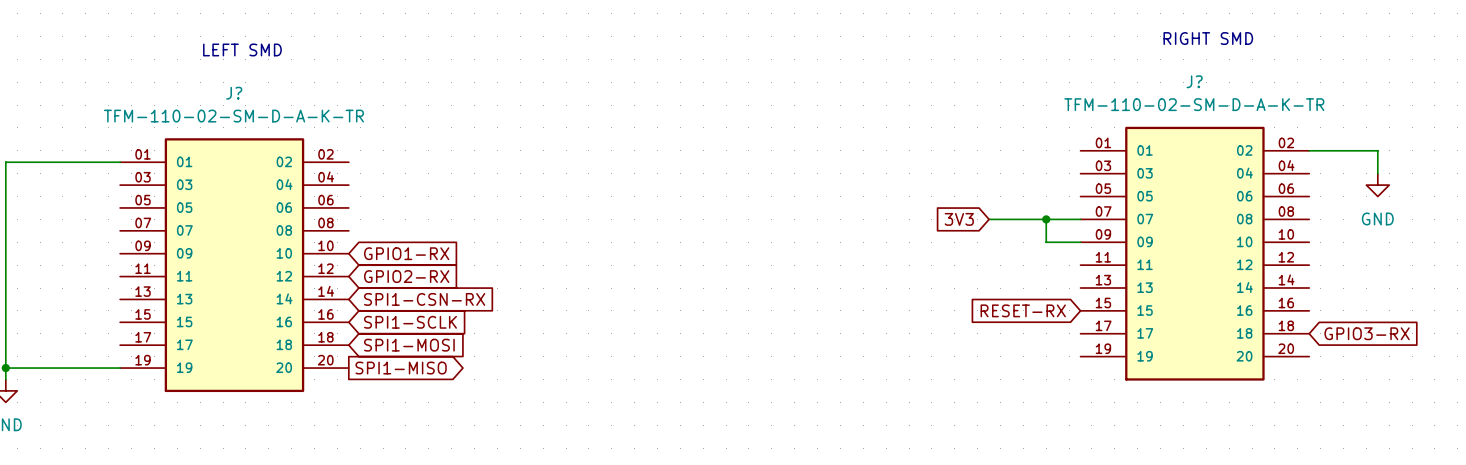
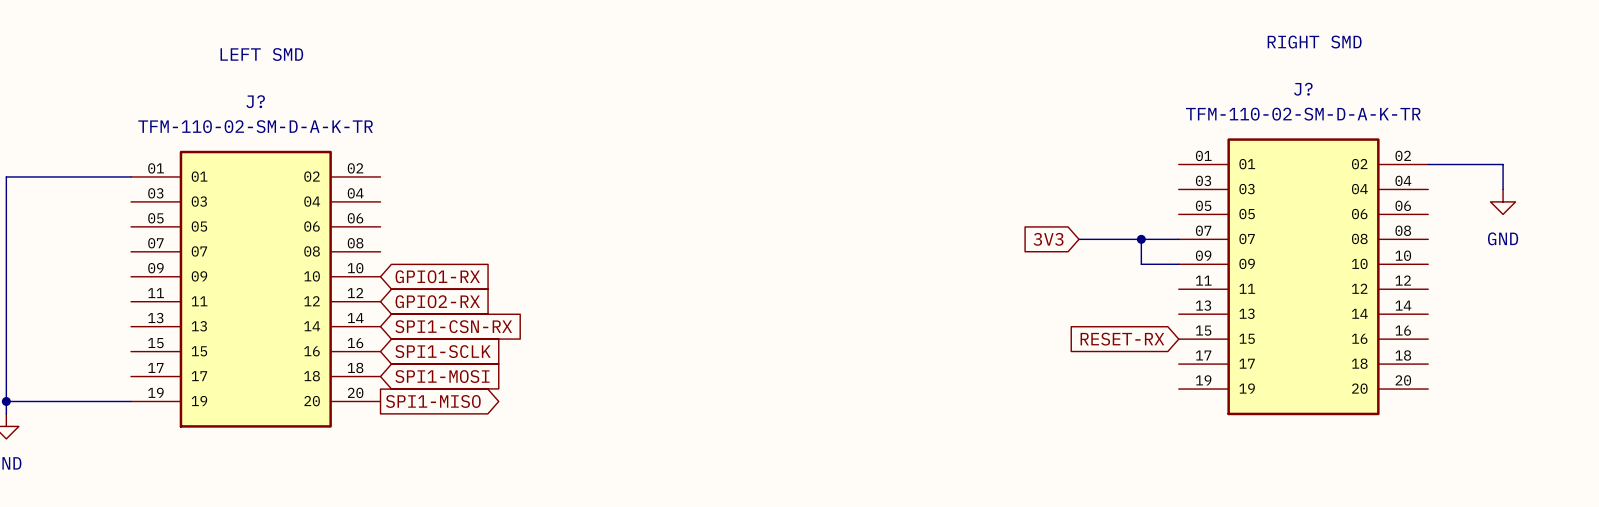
global label: GPIO3-RX (1367, 333) -> none

